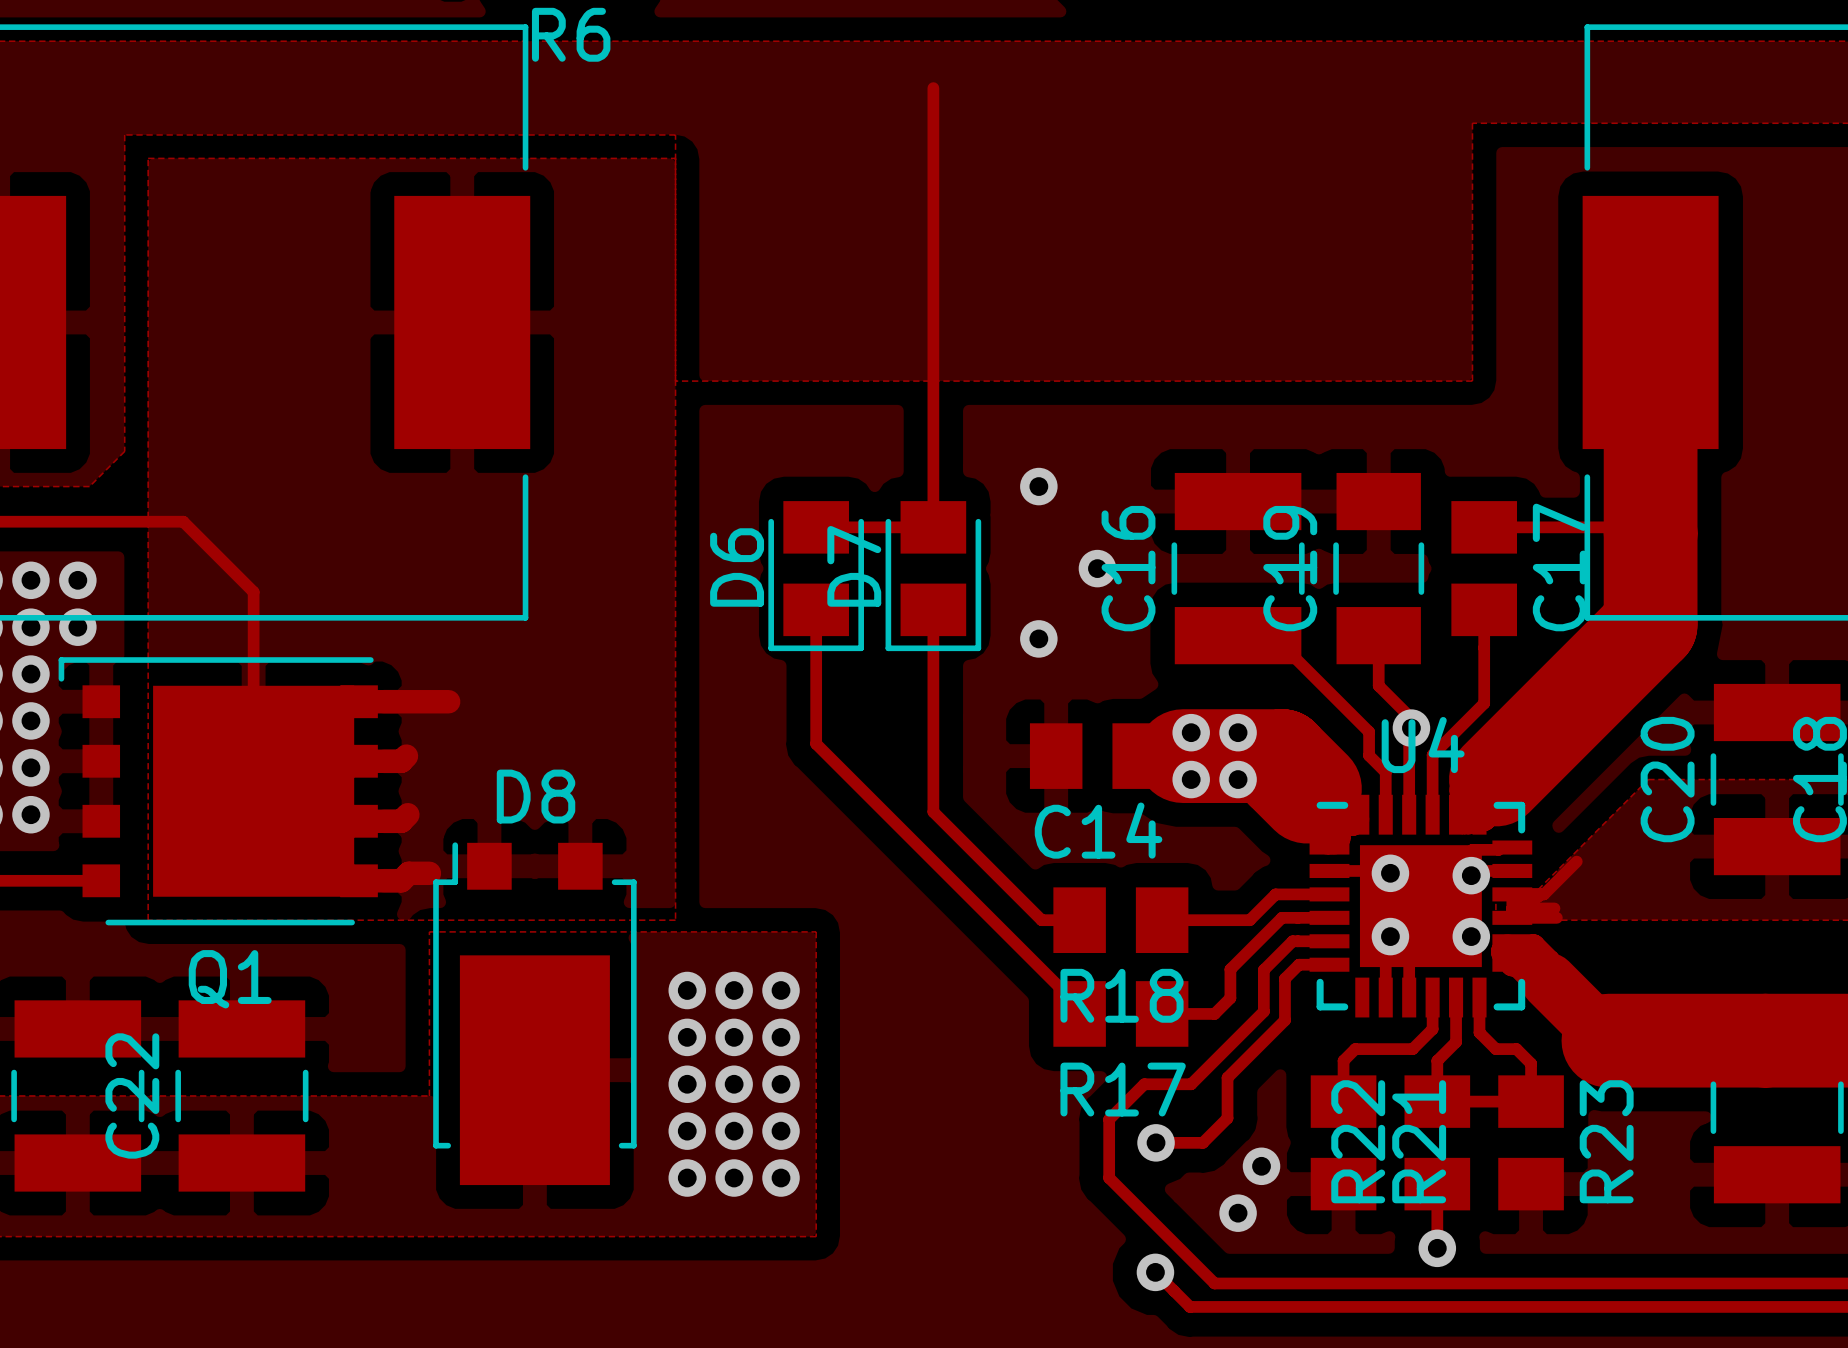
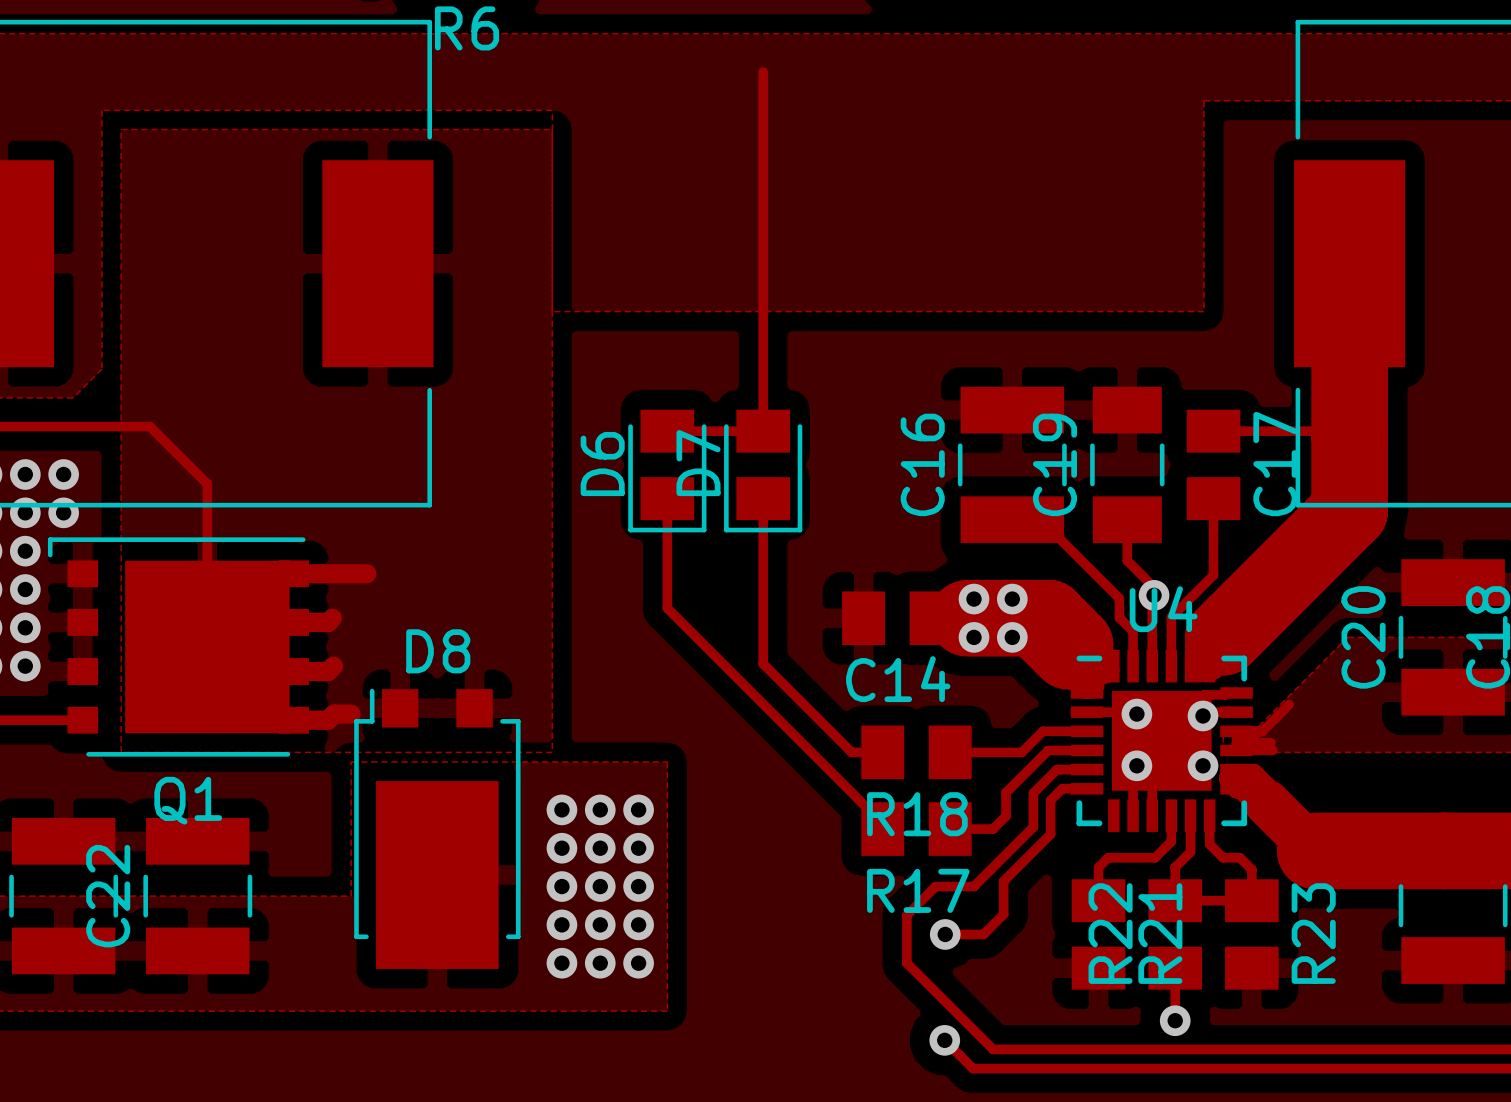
via: (1038, 486) -> none
via: (1097, 568) -> none
via: (1038, 638) -> none
via: (1261, 1166) -> none
via: (1238, 1213) -> none

